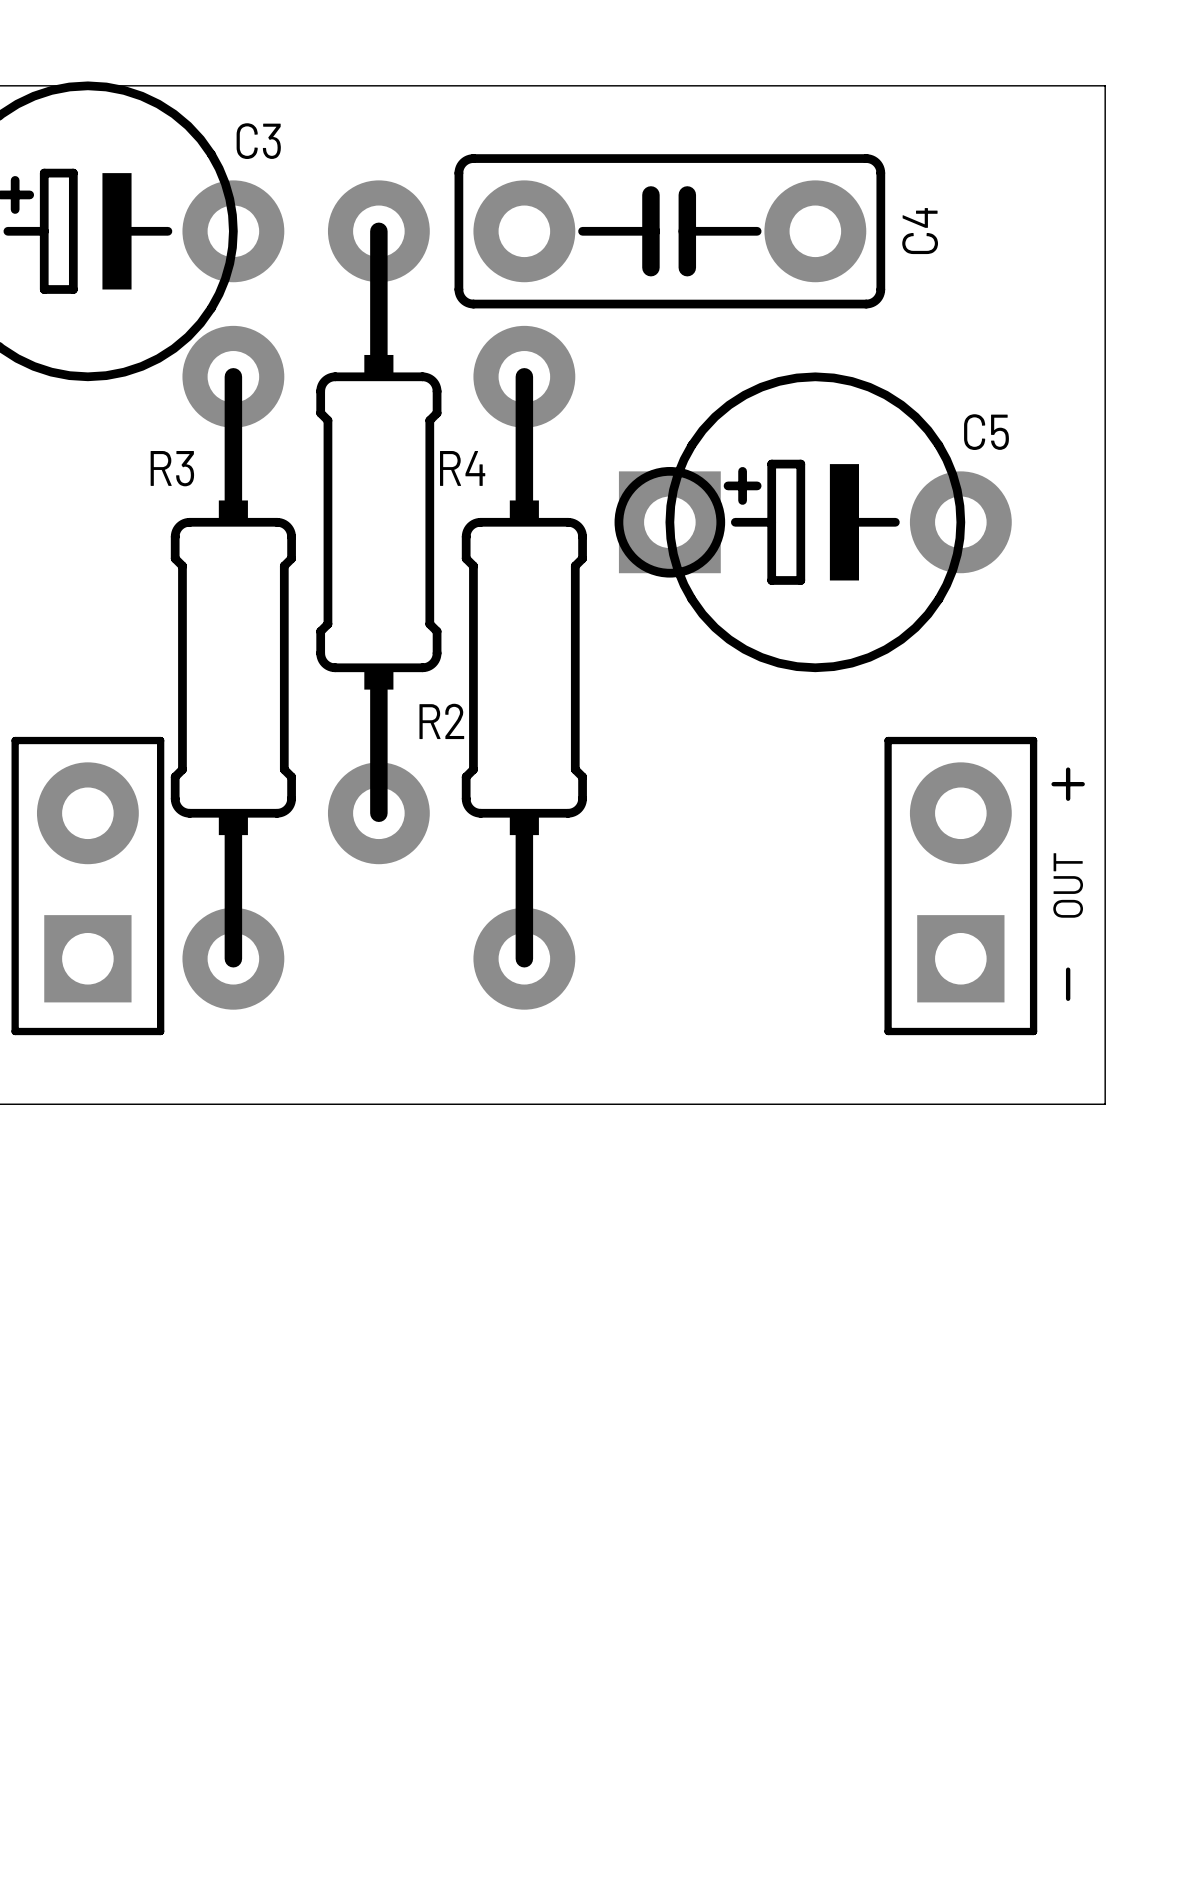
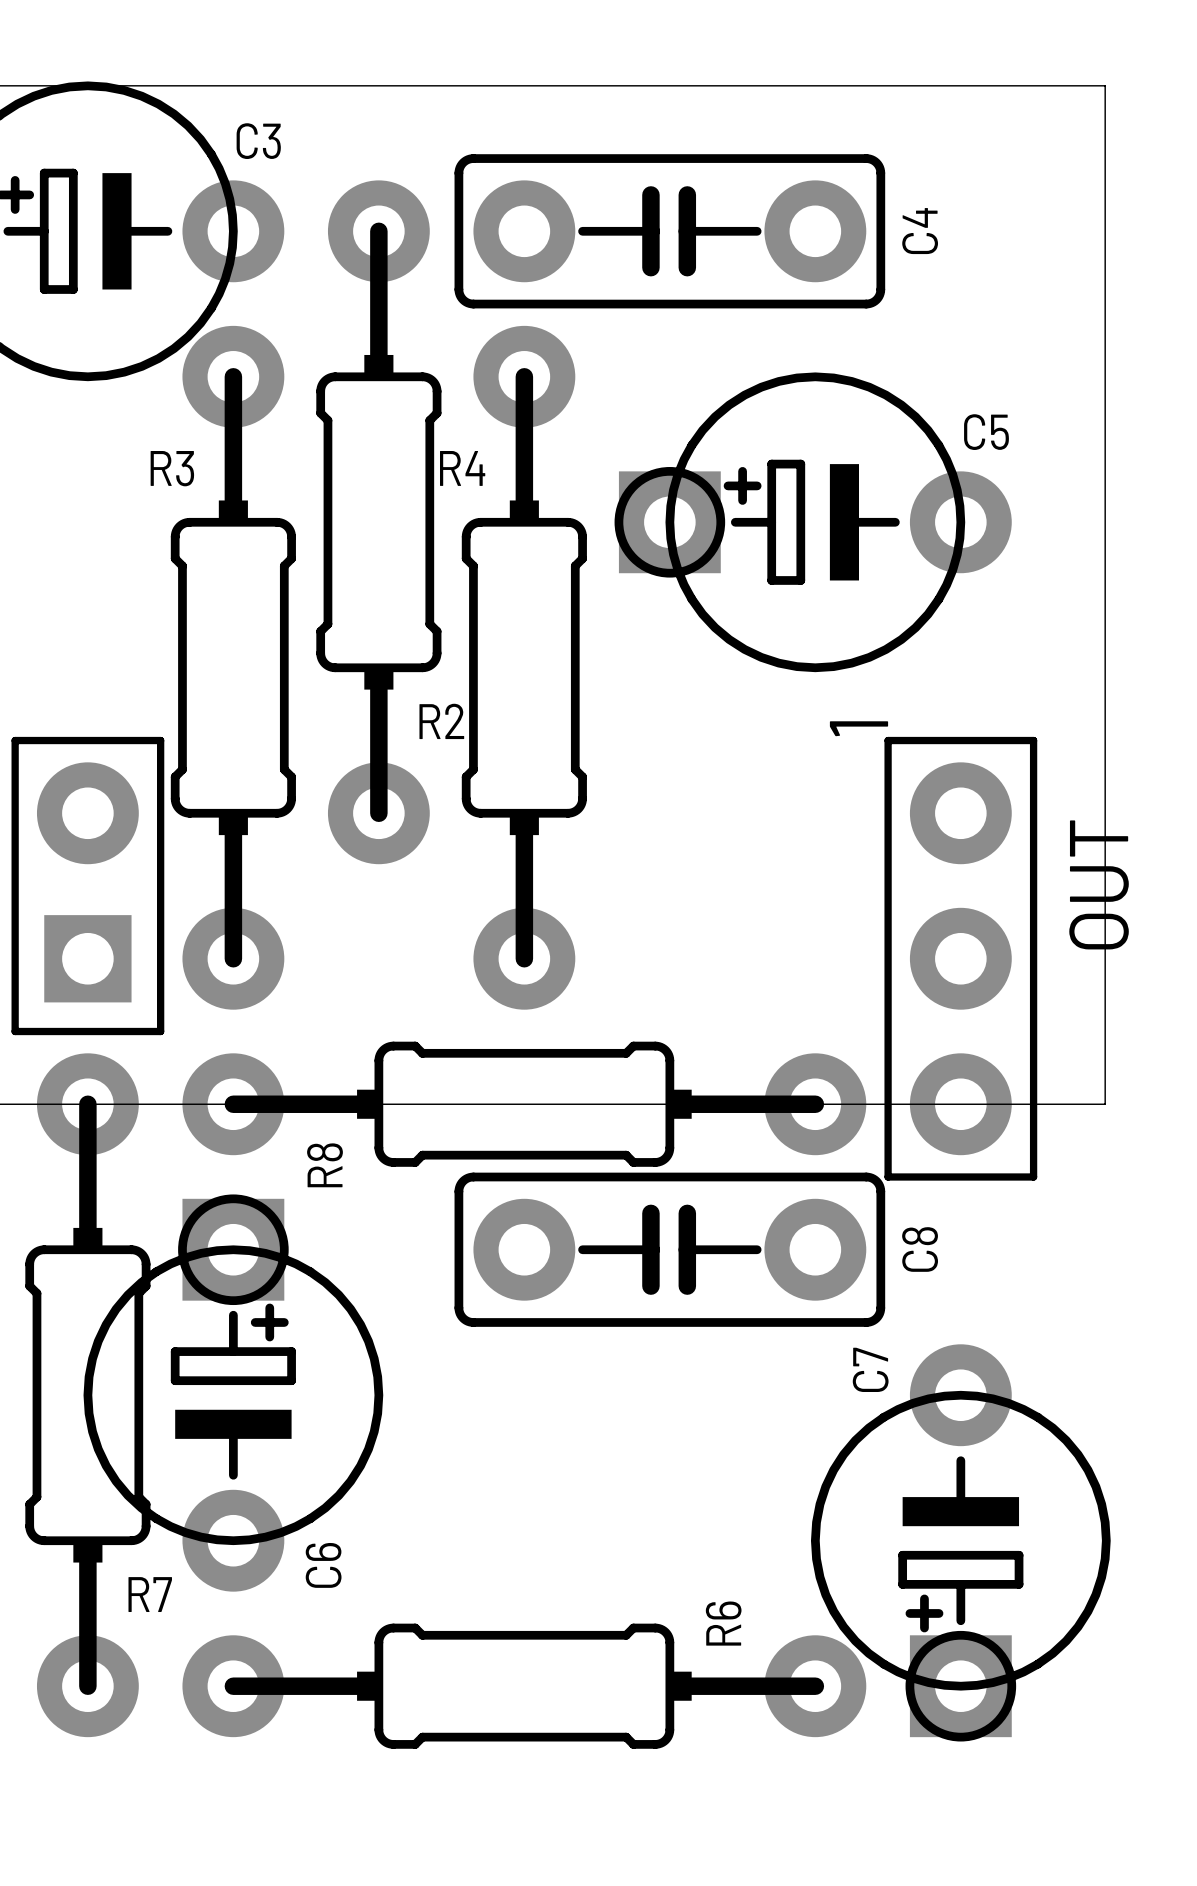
OUT: (984, 886) -> none
OUT: none -> (960, 958)
R8: none -> (524, 1104)
C8: none -> (669, 1249)
C6: none -> (233, 1393)
R7: none -> (87, 1395)
C7: none -> (960, 1542)
R6: none -> (524, 1686)

